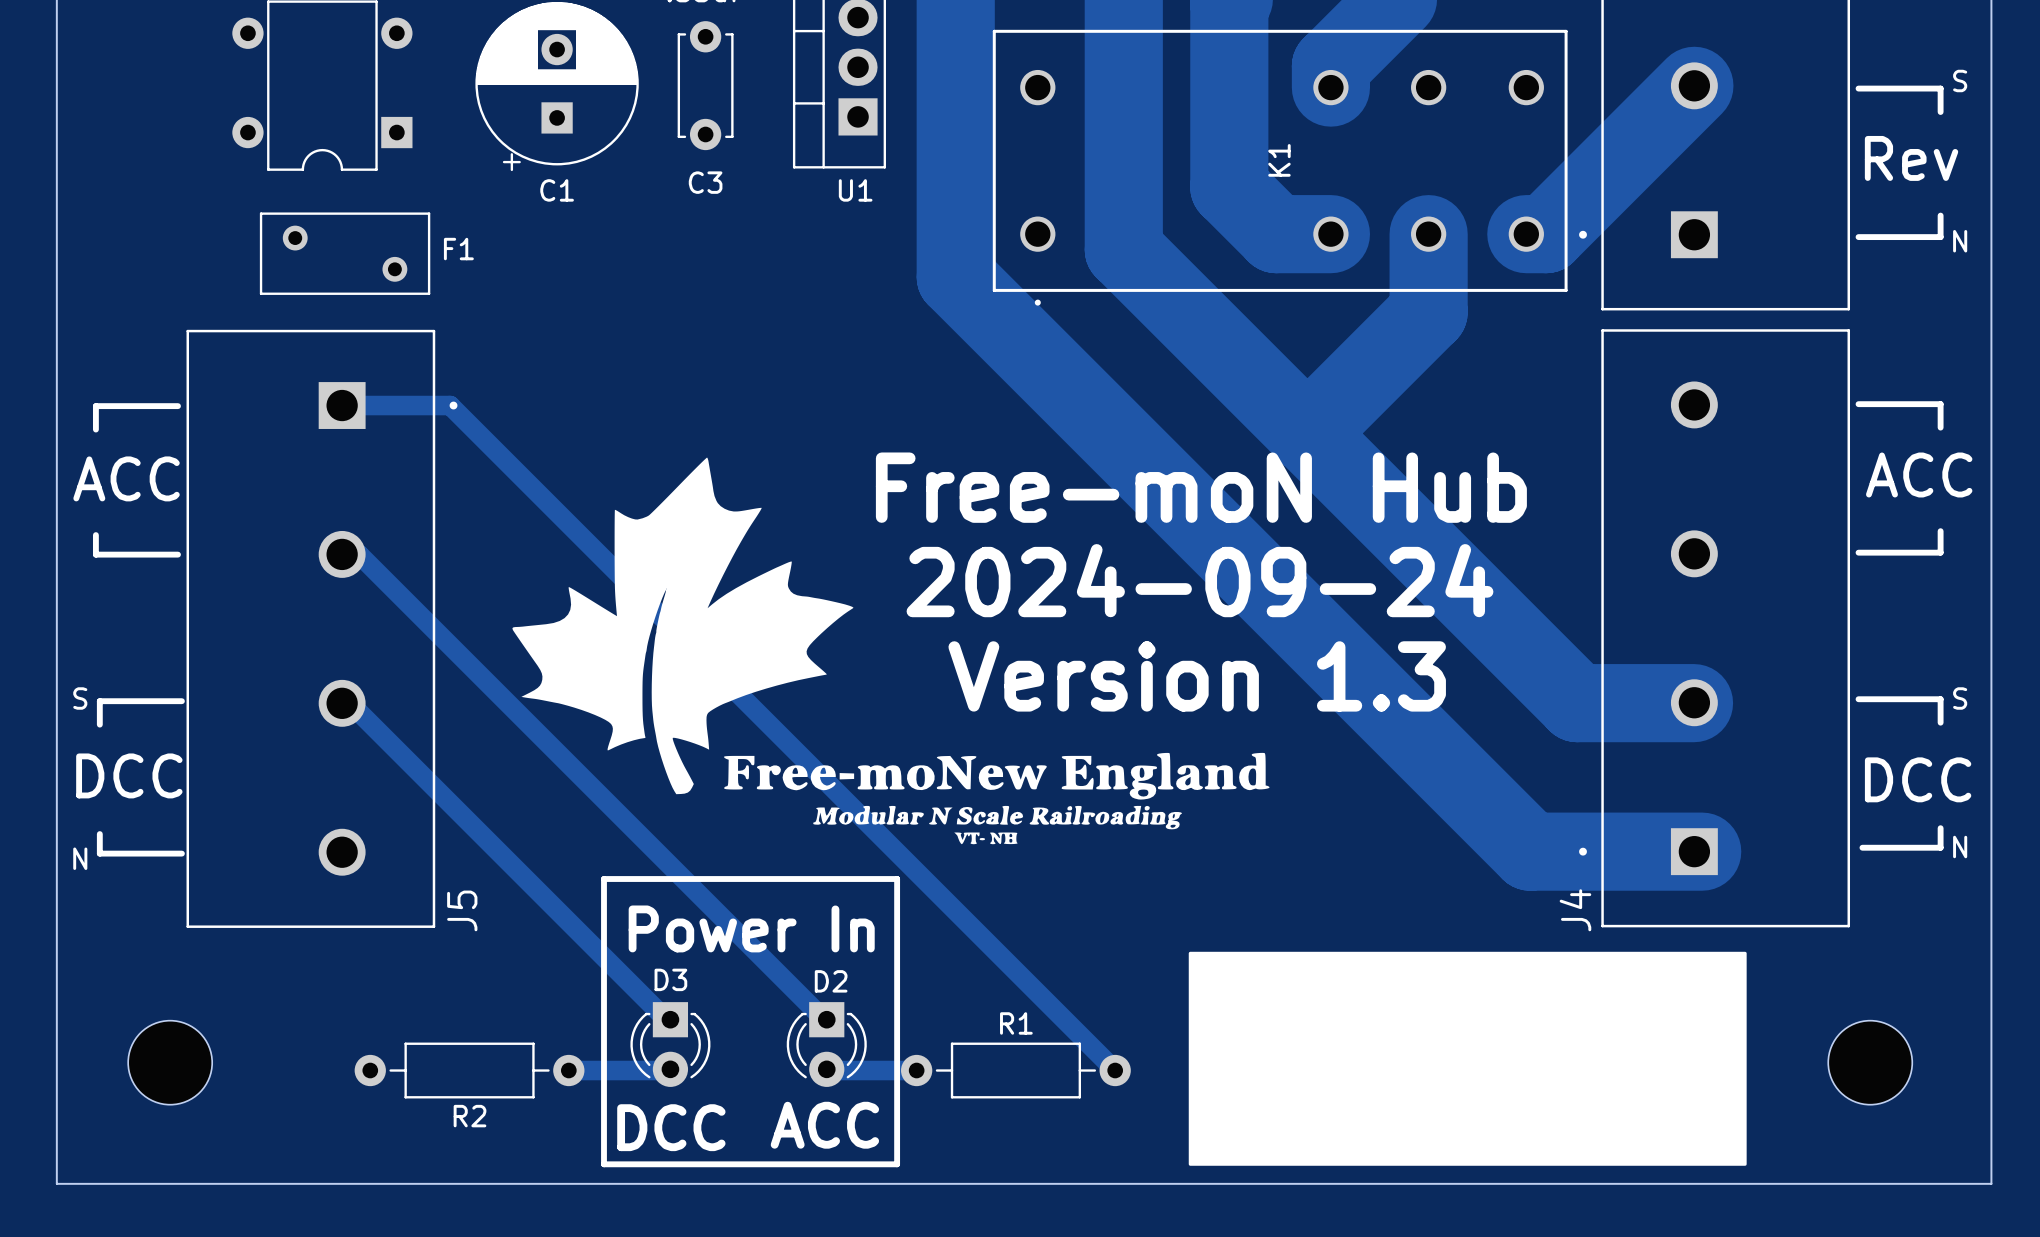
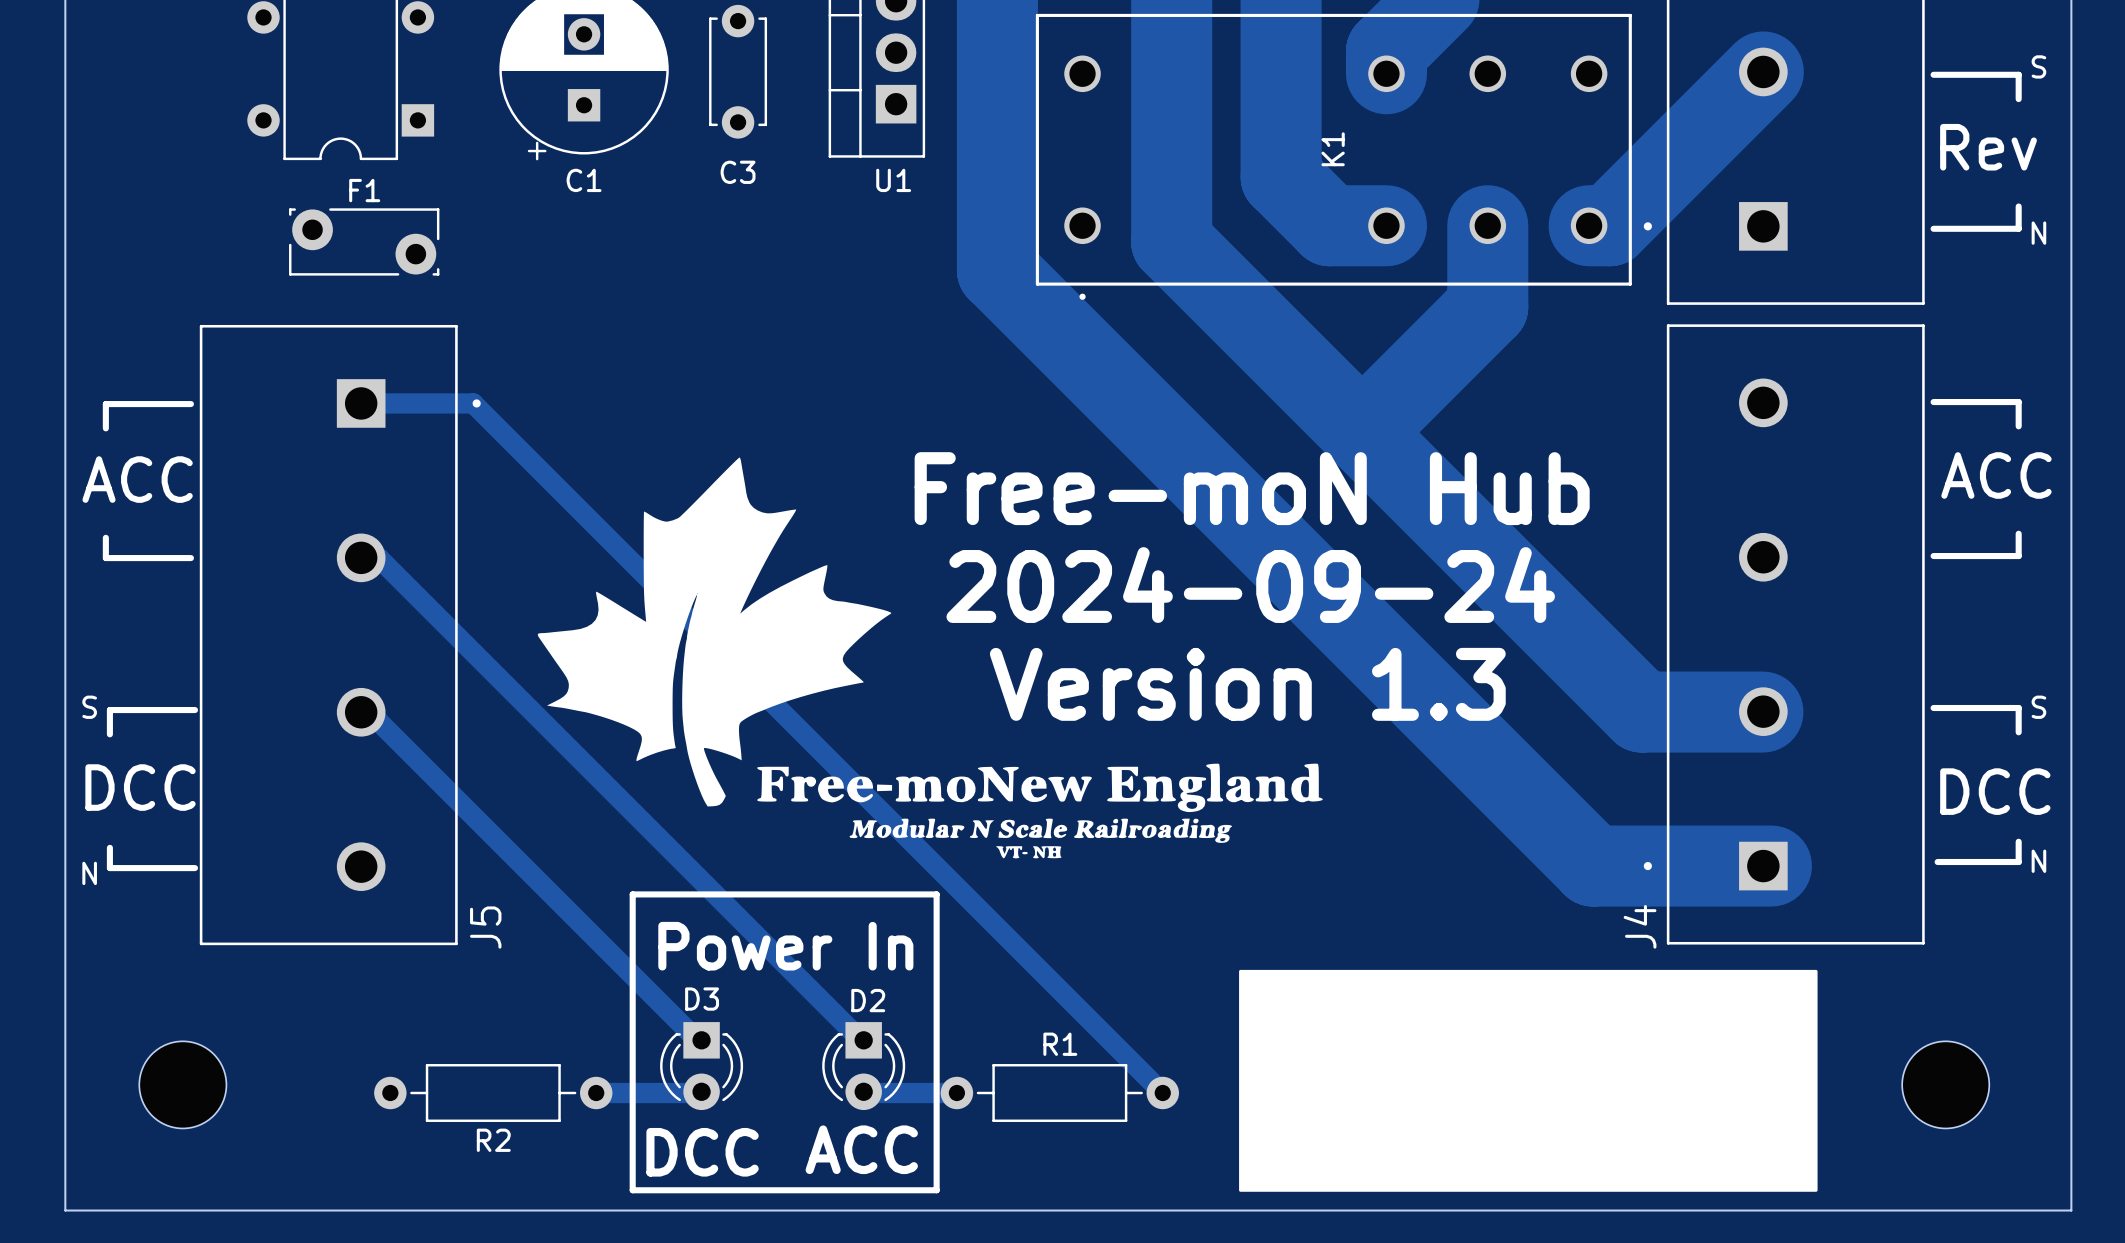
F1 footprint: [259, 212, 431, 295] -> [289, 208, 440, 276]
F1 name position: F1 (458, 249) -> F1 (364, 190)

